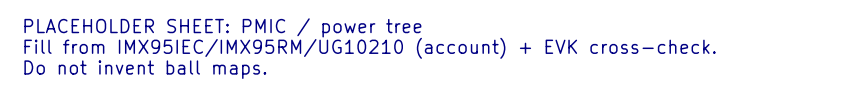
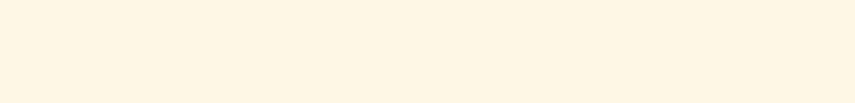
text: PLACEHOLDER SHEET: PMIC / power tree (222, 27) -> none
text: Fill from IMX95IEC/IMX95RM/UG10210 (account) + EVK cross-check. (370, 48) -> none
text: Do not invent ball maps. (145, 69) -> none

